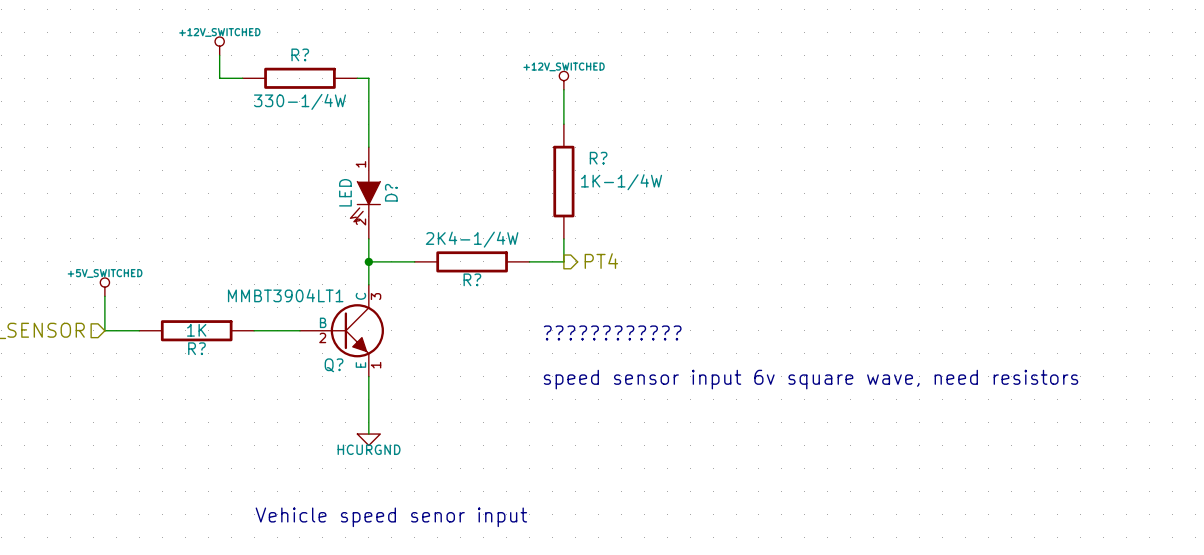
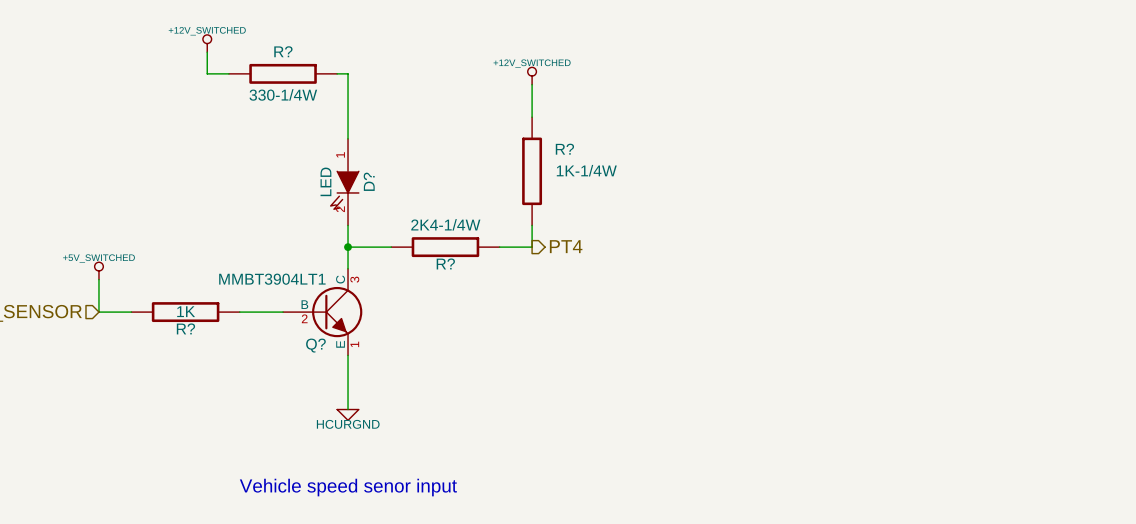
text: ???????????? (612, 332) -> none
text: speed sensor input 6v square wave, need resistors (811, 379) -> none

